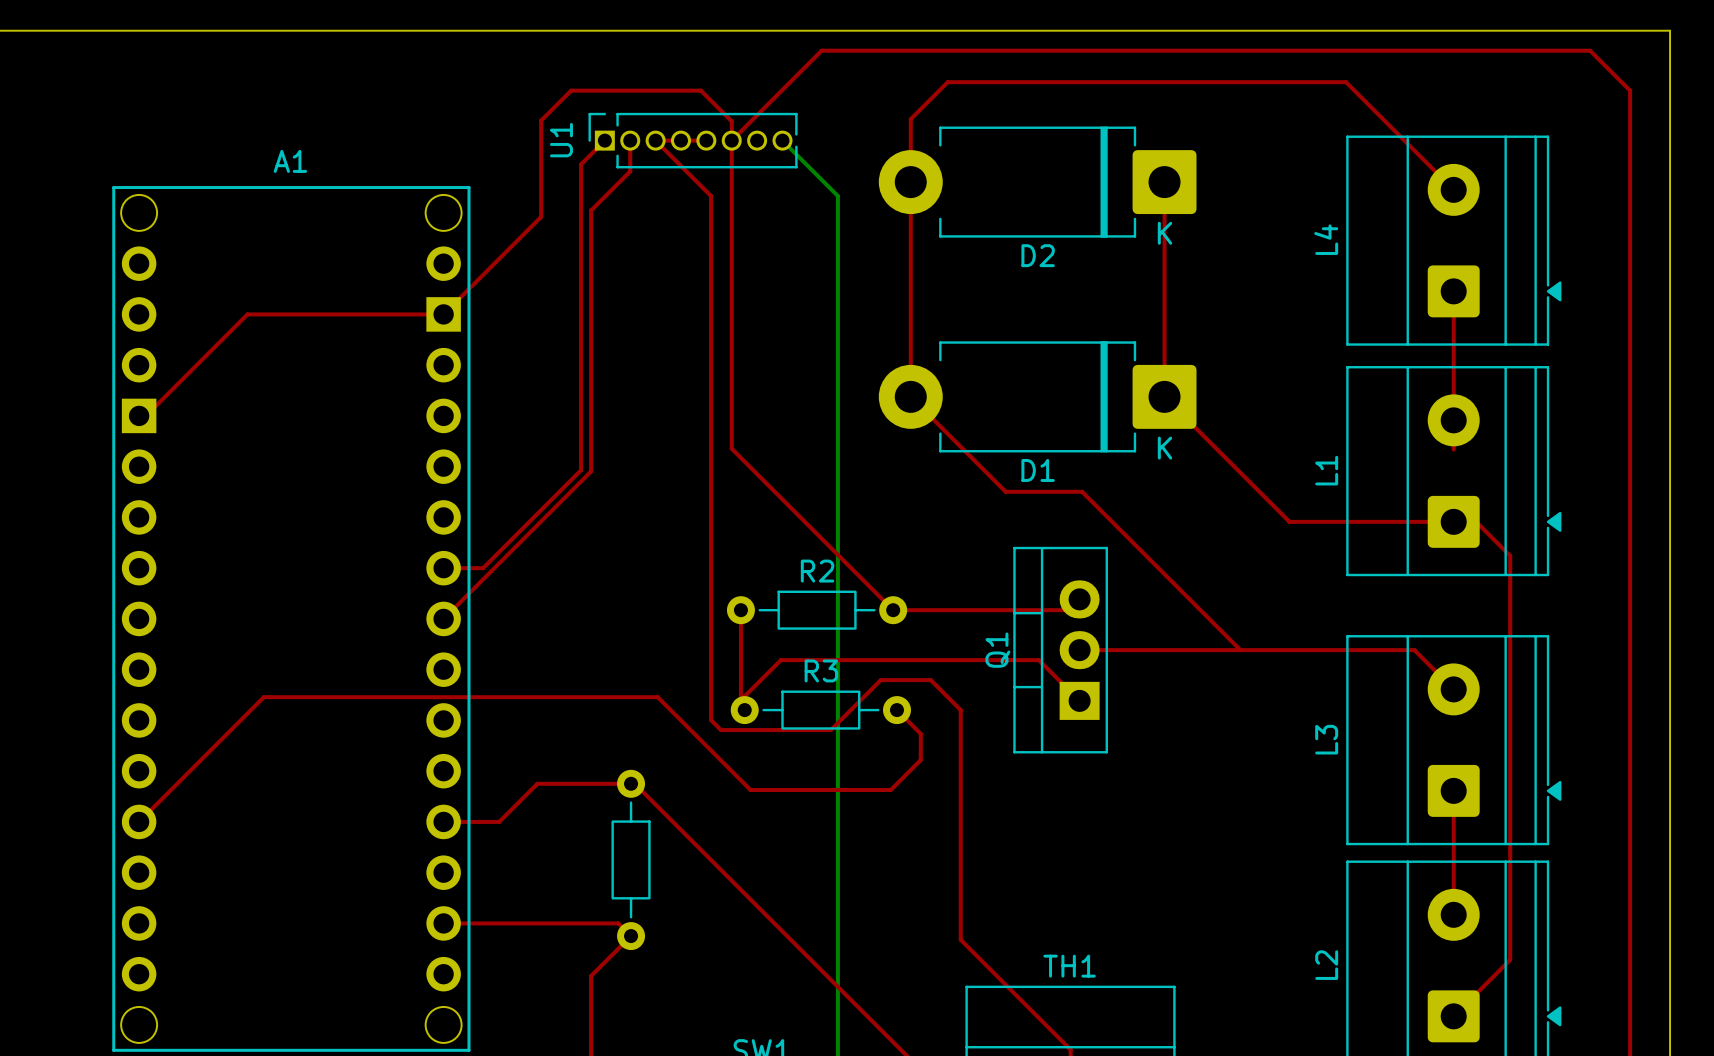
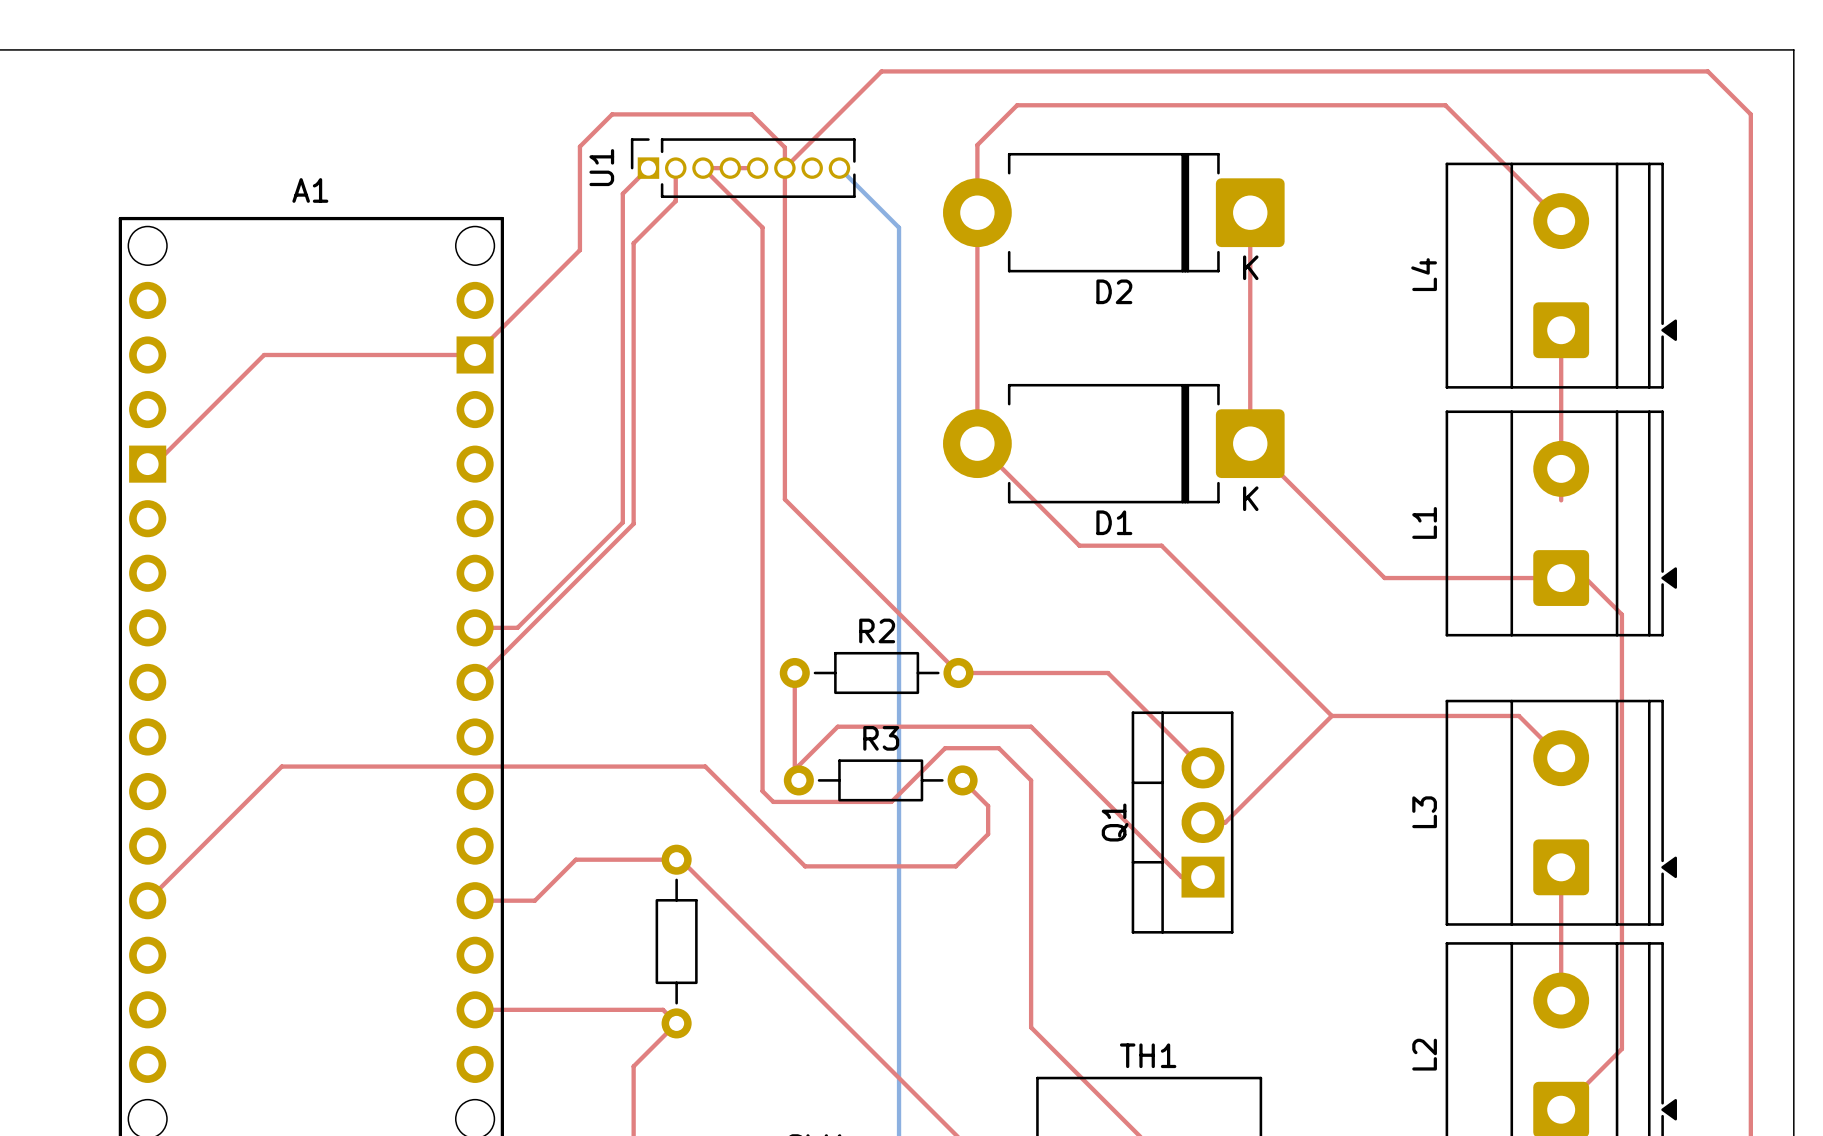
top track: (1079, 599) (1068, 610) (1032, 610) -> (1191, 779) (1202, 767) (1108, 673)
Q1 position: (1060, 650) -> (1182, 822)
top track: (1079, 650) (1240, 650) -> (1202, 822) (1225, 822) (1331, 715)
top track: (960, 660) (1038, 660) (1079, 700) -> (1031, 726) (1181, 877) (1202, 877)

